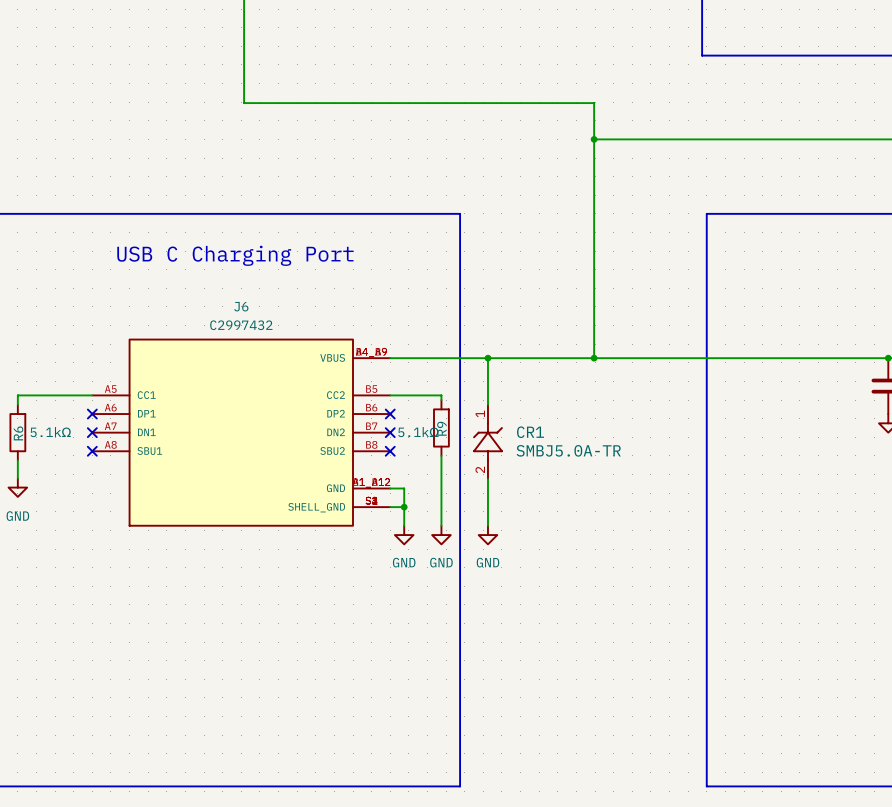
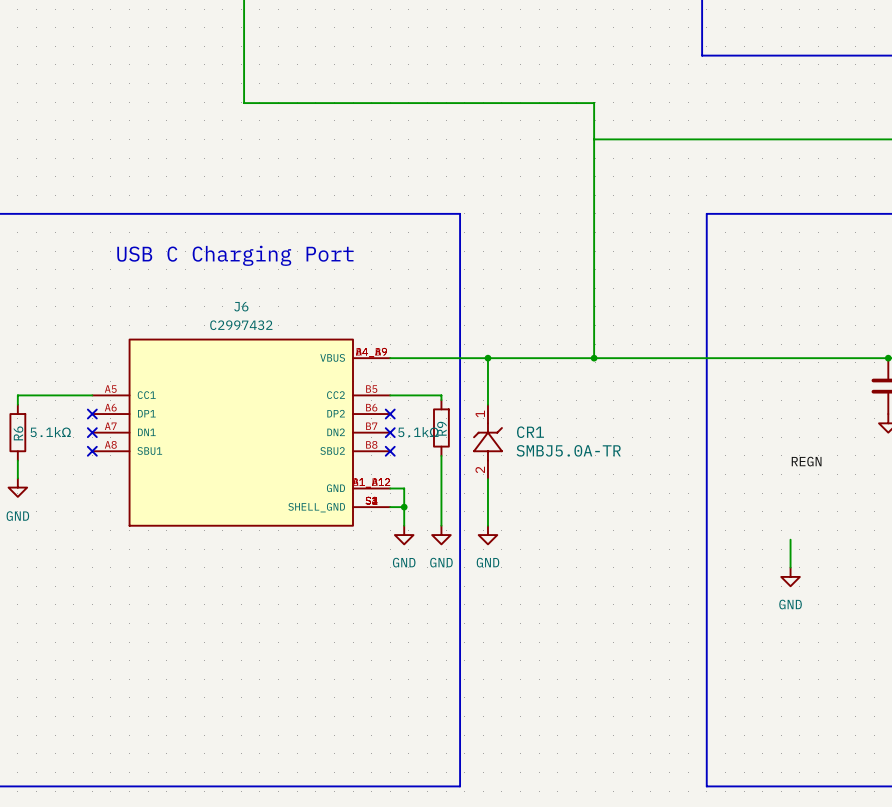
junction: (594, 139) -> none
label: none -> REGN (806, 461)
wire: none -> (790, 539) (790, 567)
power symbol: none -> GND (790, 576)

